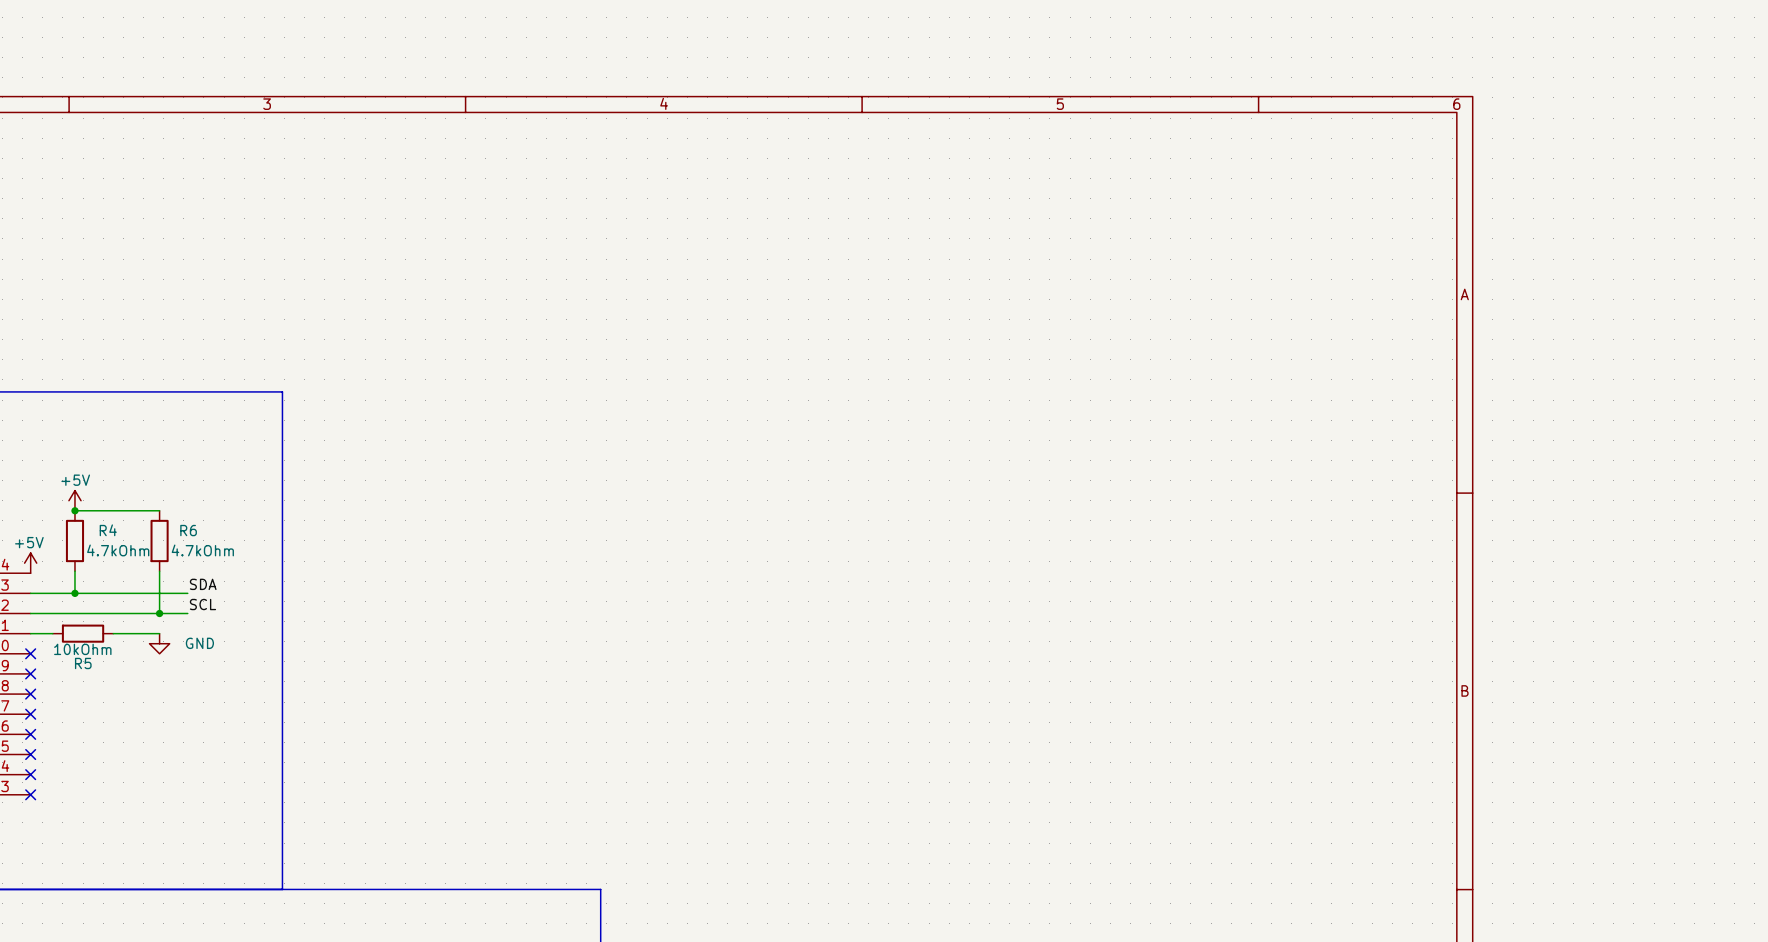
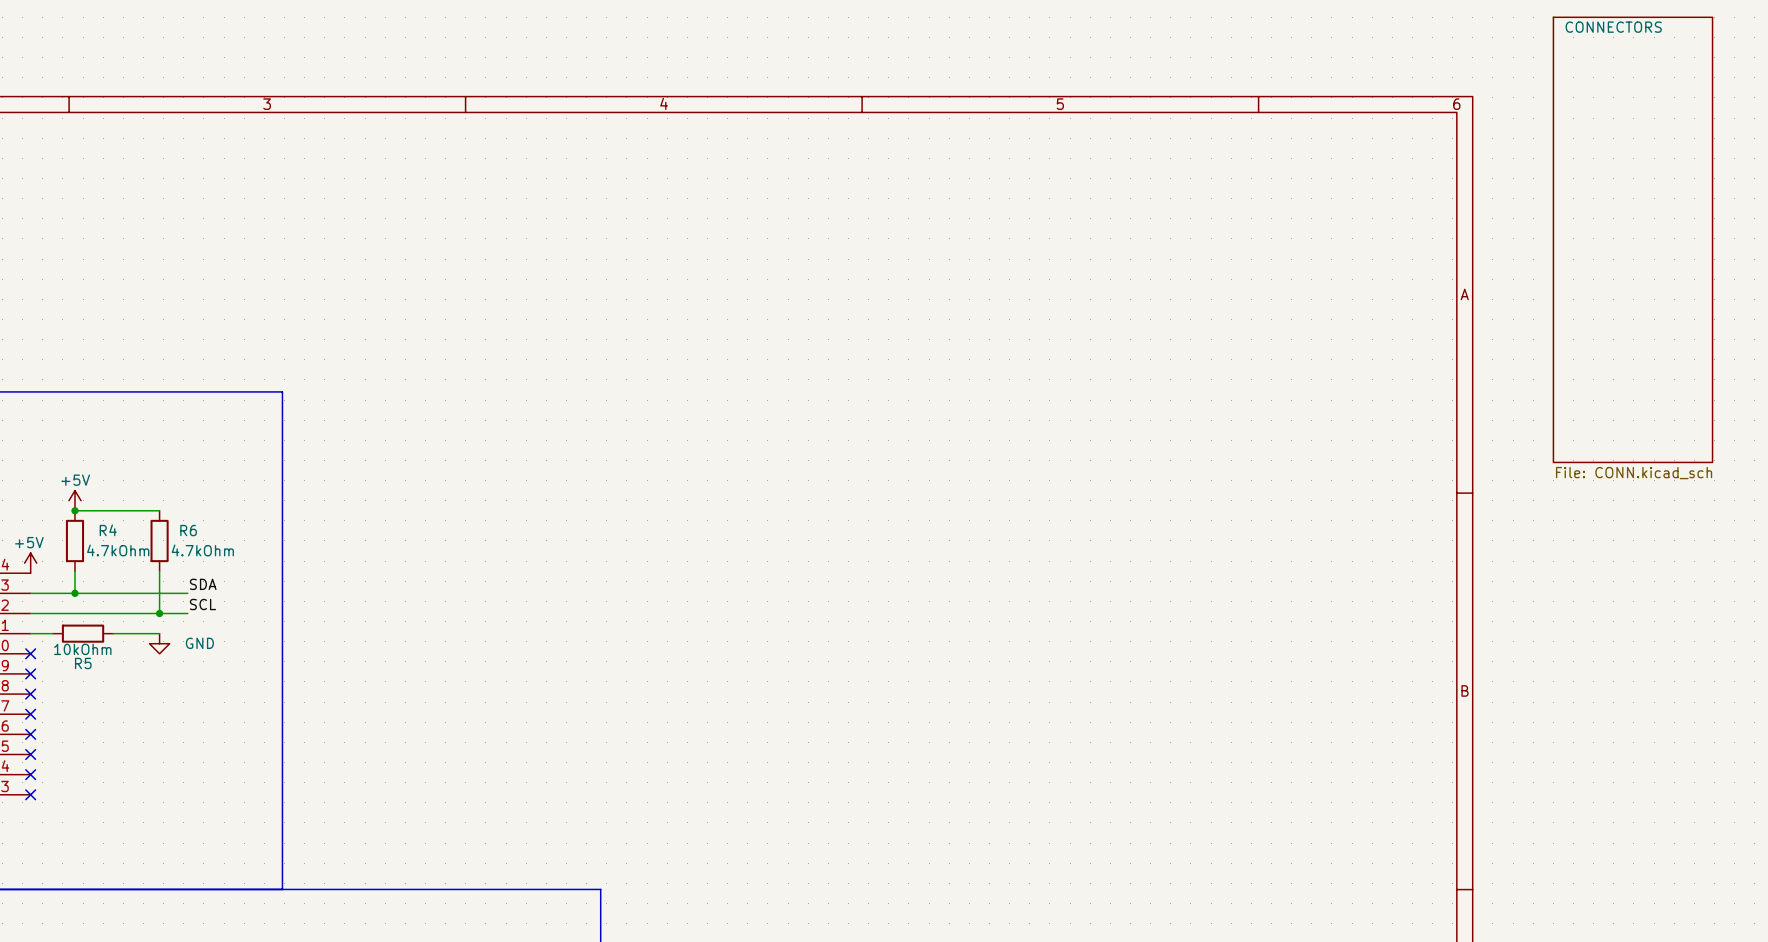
sheet CONNECTORS: none -> File: CONN.kicad_sch (1632, 239)

